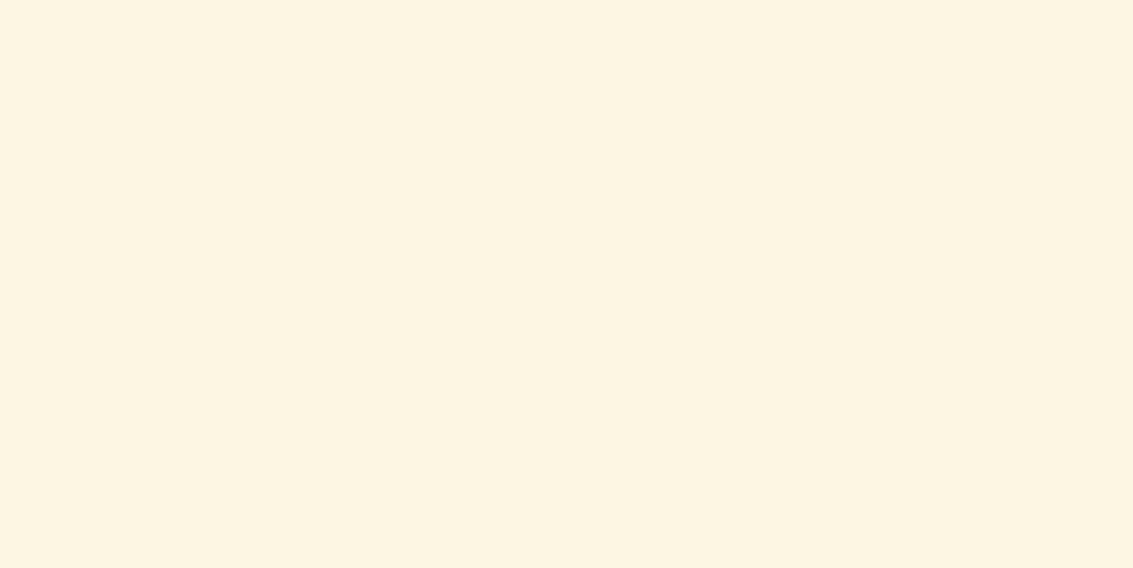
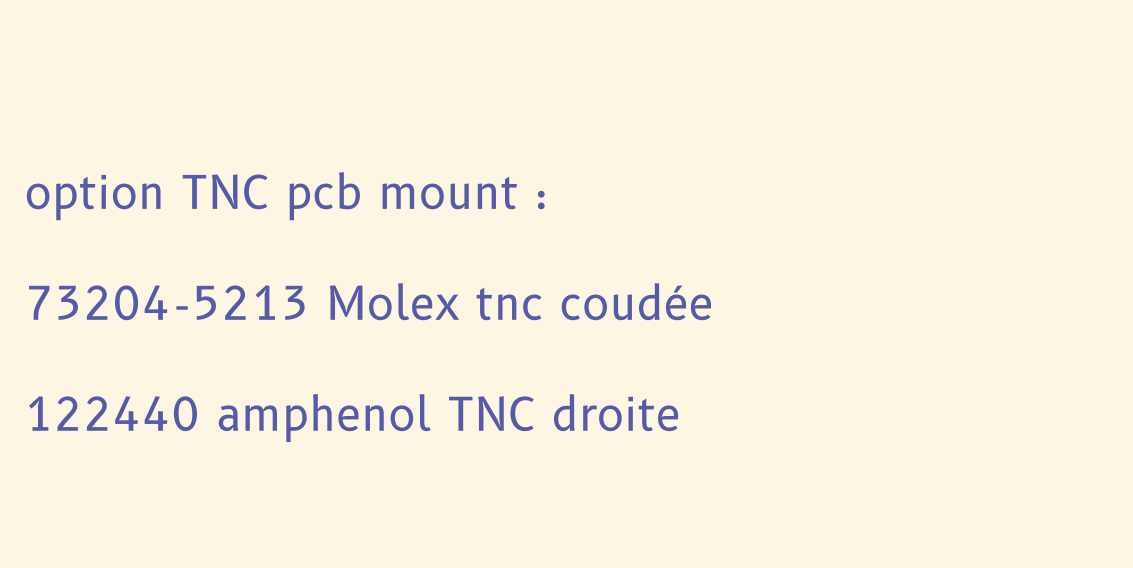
text: none -> option TNC pcb mount : (285, 196)
text: none -> 73204-5213 Molex tnc coudée (370, 301)
text: none -> 122440 amphenol TNC droite (353, 418)

